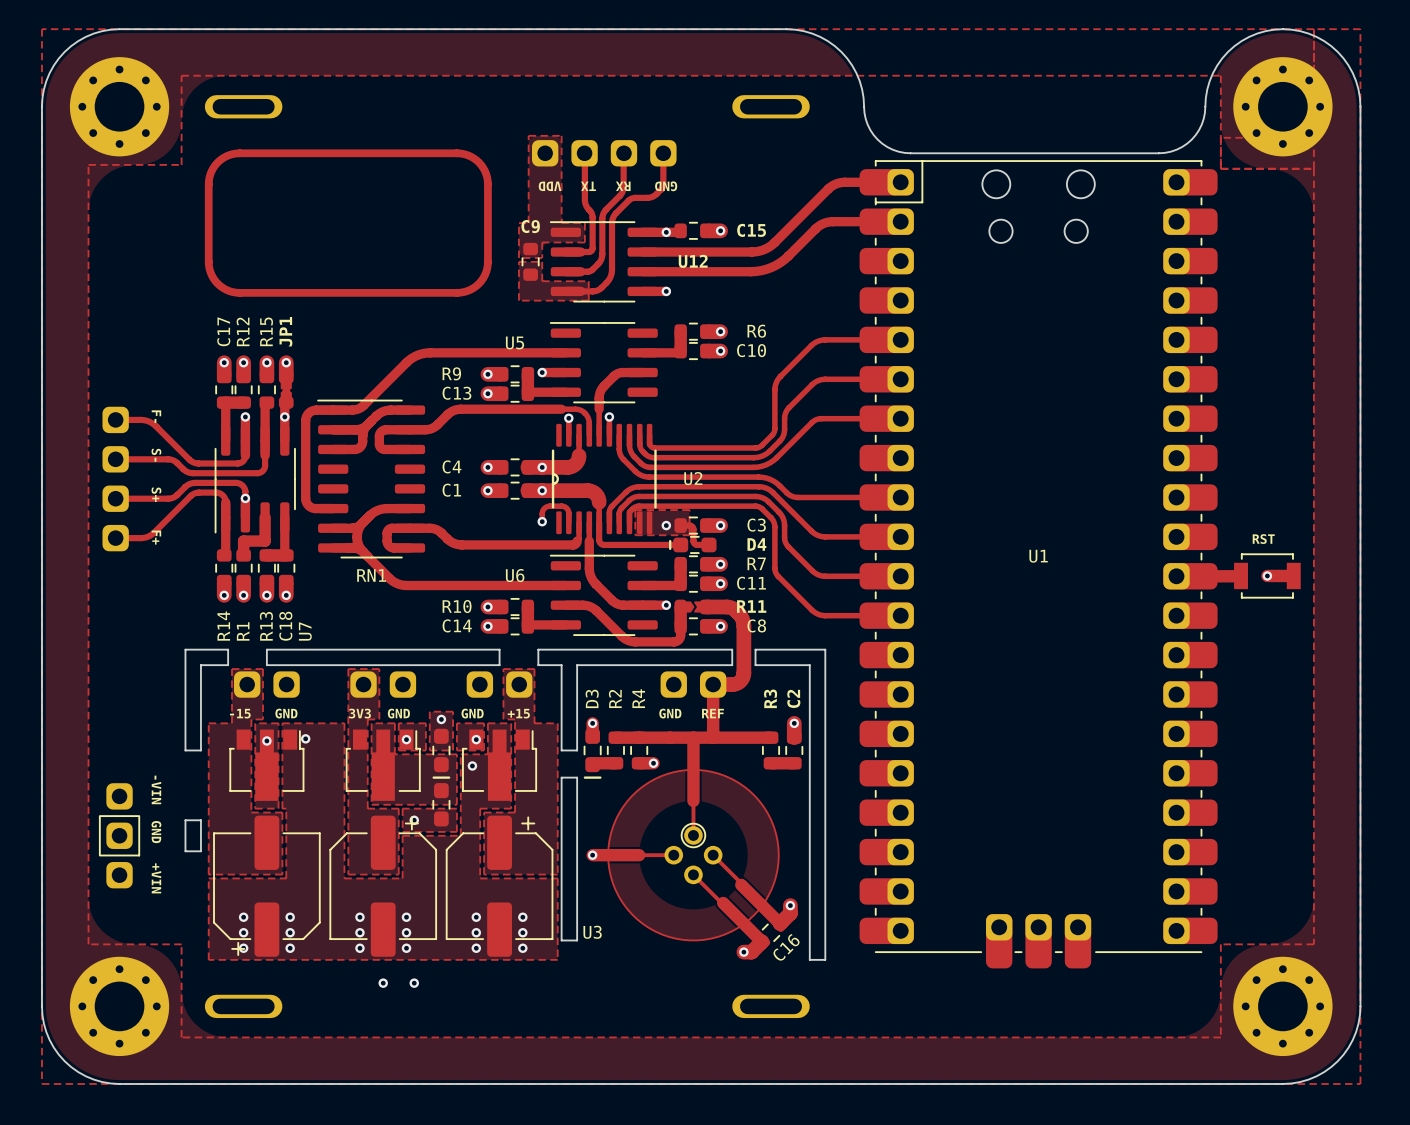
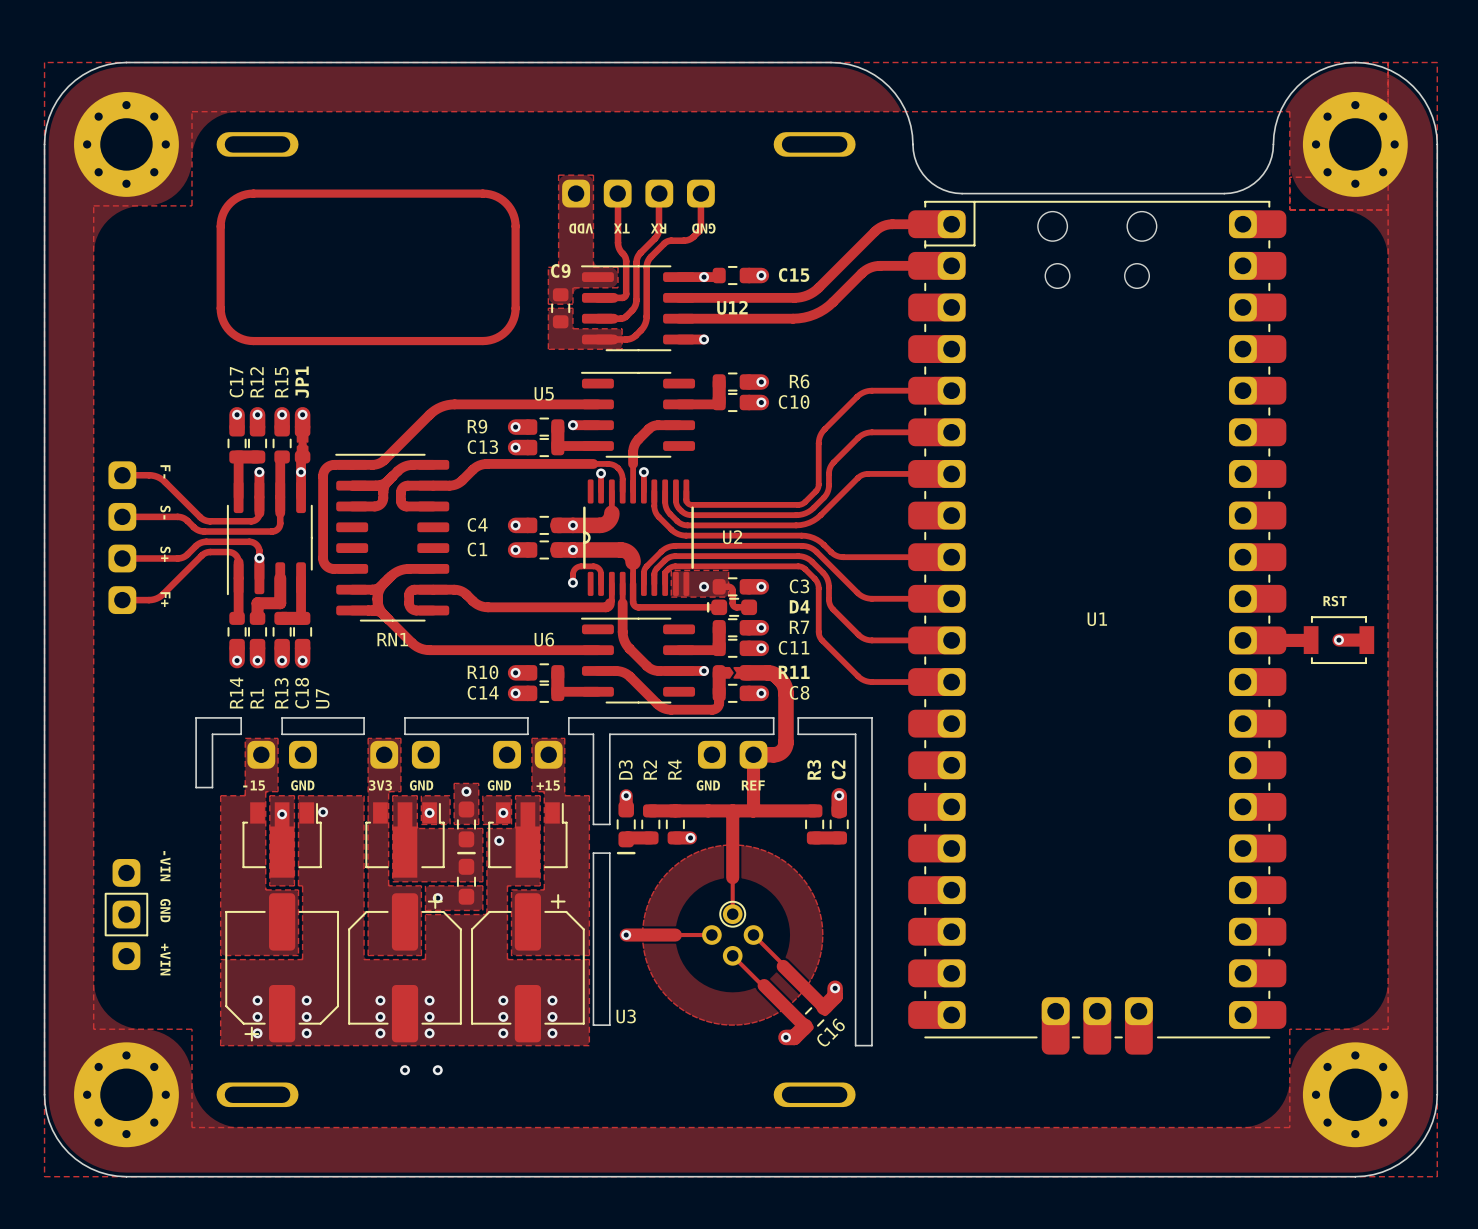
board edge: (344, 649) (383, 649) -> (364, 717) (364, 734)
board edge: (344, 665) (383, 665) -> (405, 717) (405, 734)
board edge: (185, 715) (185, 750) (200, 750) (200, 715) -> (196, 787) (212, 787)
board edge: (185, 820) (185, 851) (200, 851) (200, 820) (185, 820) -> none

